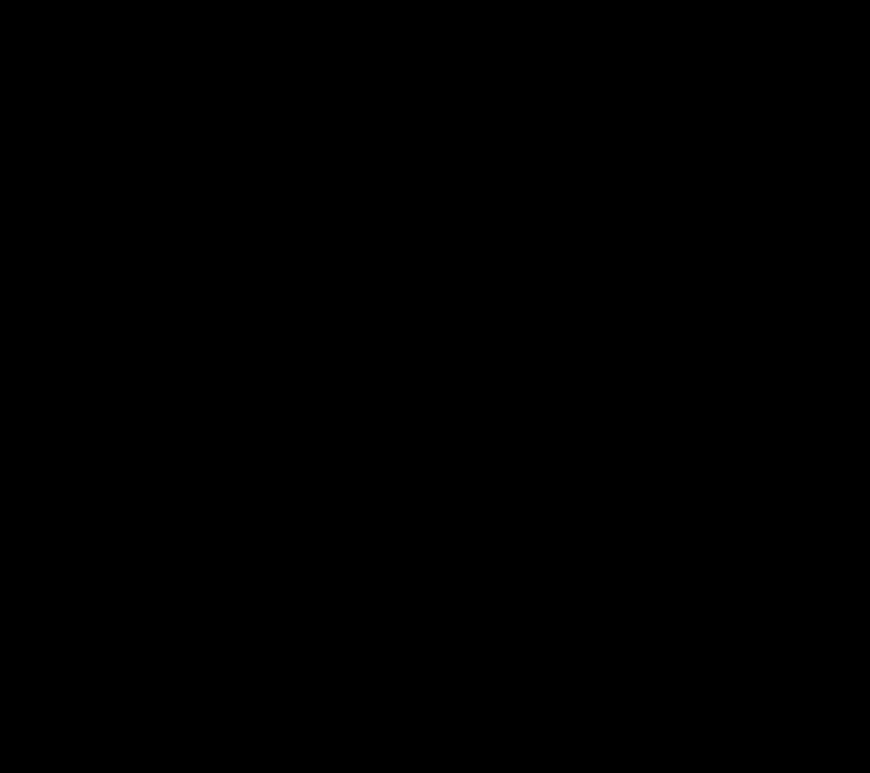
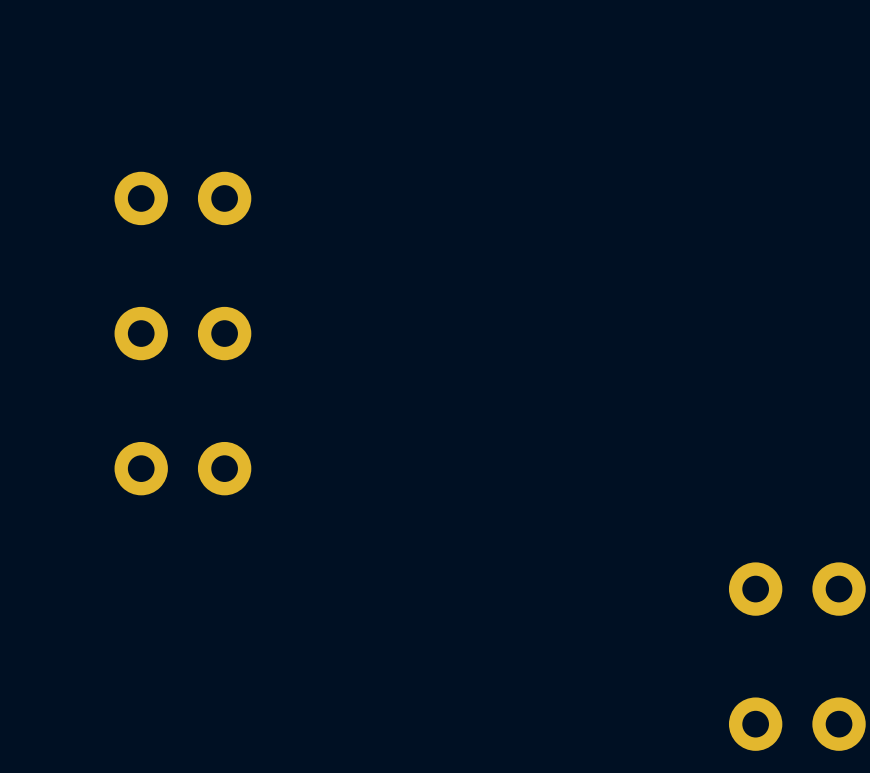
part: none -> (182, 198)
part: none -> (182, 333)
part: none -> (182, 468)
part: none -> (797, 589)
part: none -> (797, 724)

